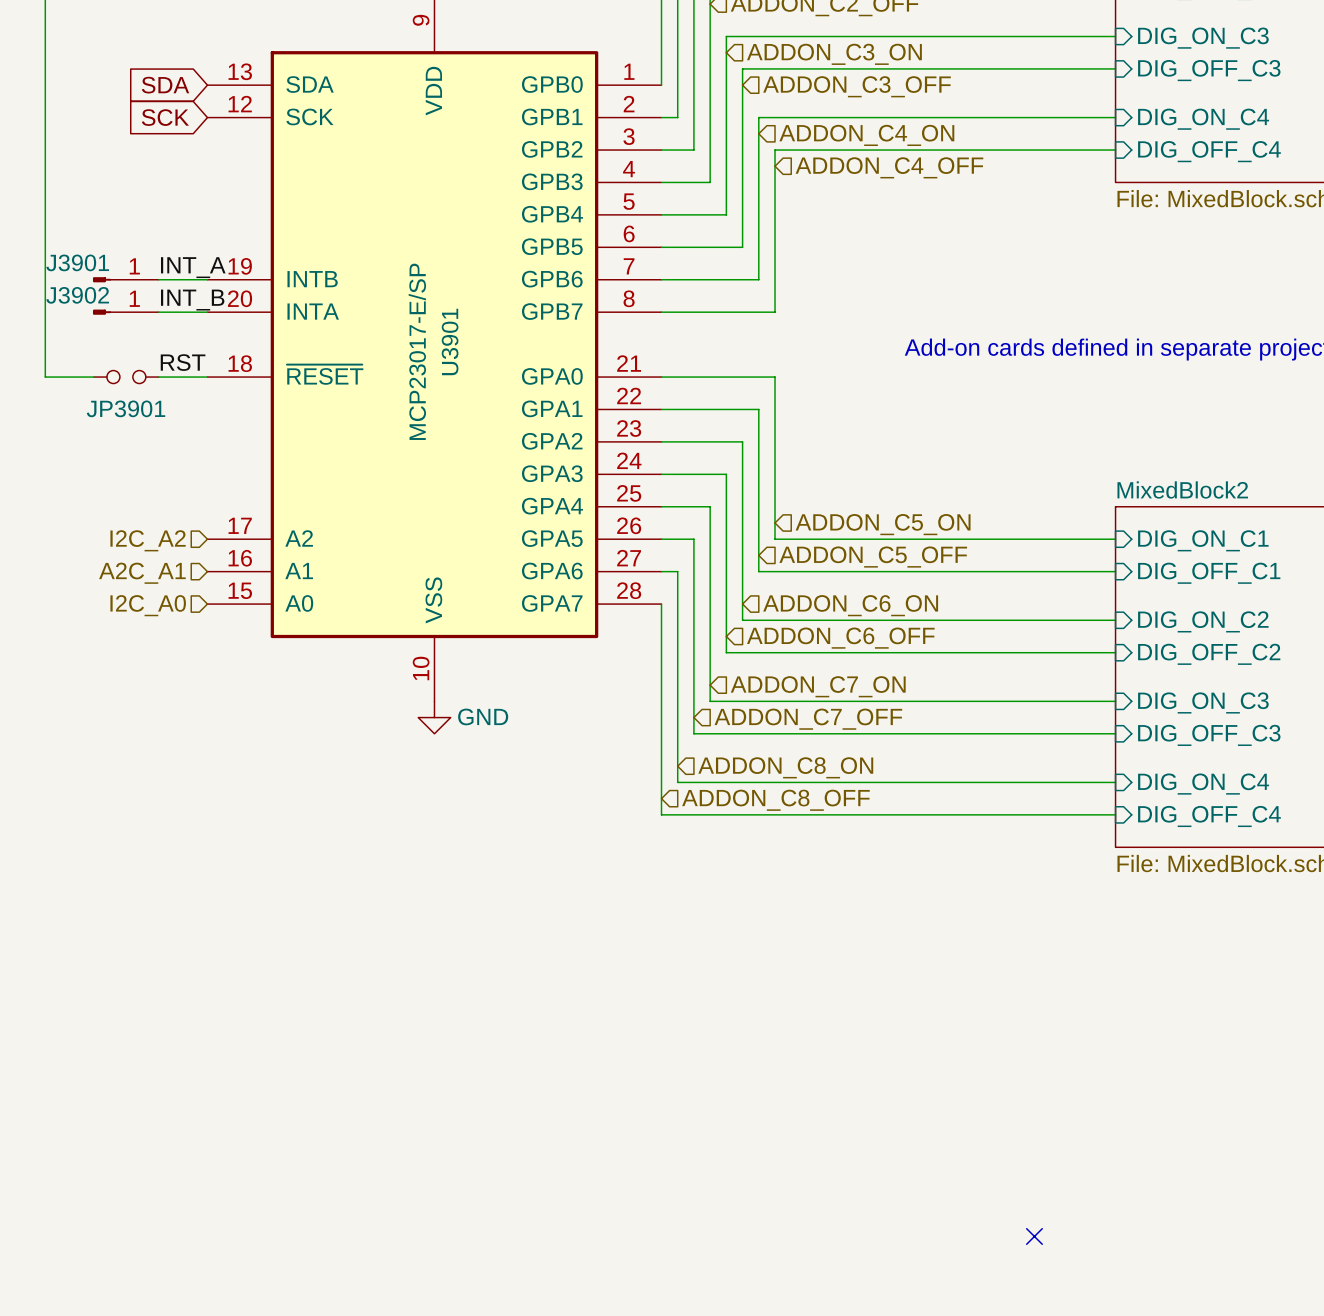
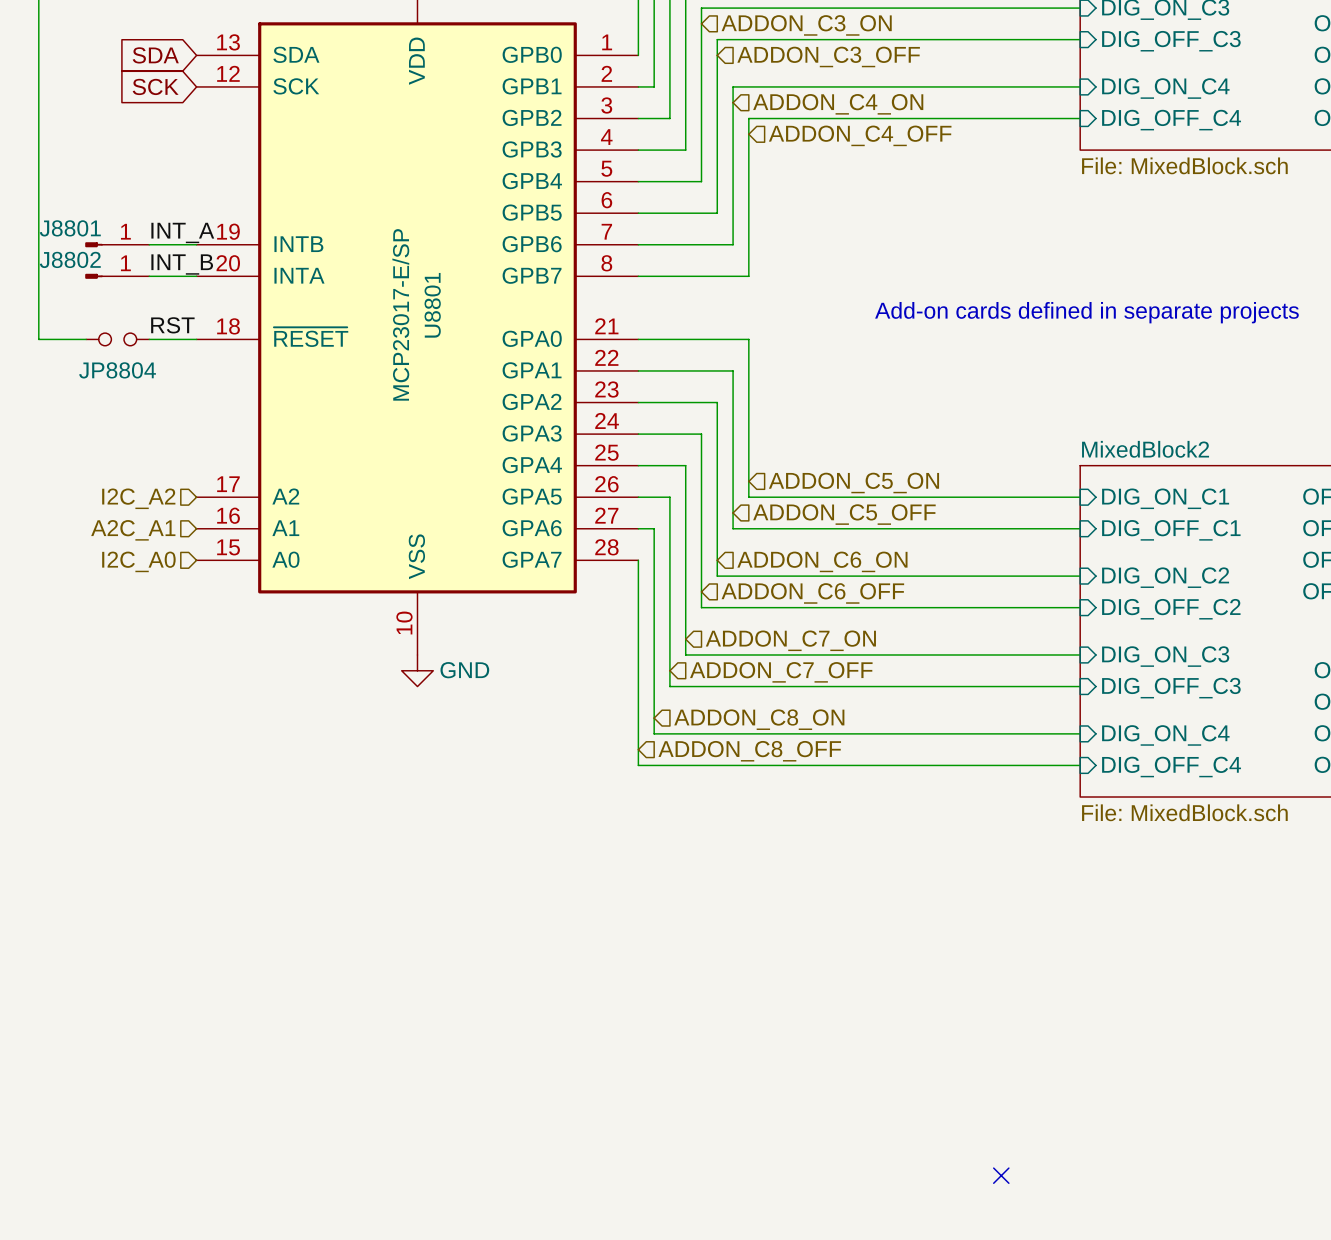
J3901 name: J3901 (77, 262) -> J8801 (70, 228)
J3902 name: J3902 (77, 295) -> J8802 (70, 259)
U3901 name: U3901 (450, 341) -> U8801 (432, 305)
JP3901 name: JP3901 (125, 408) -> JP8804 (117, 370)

